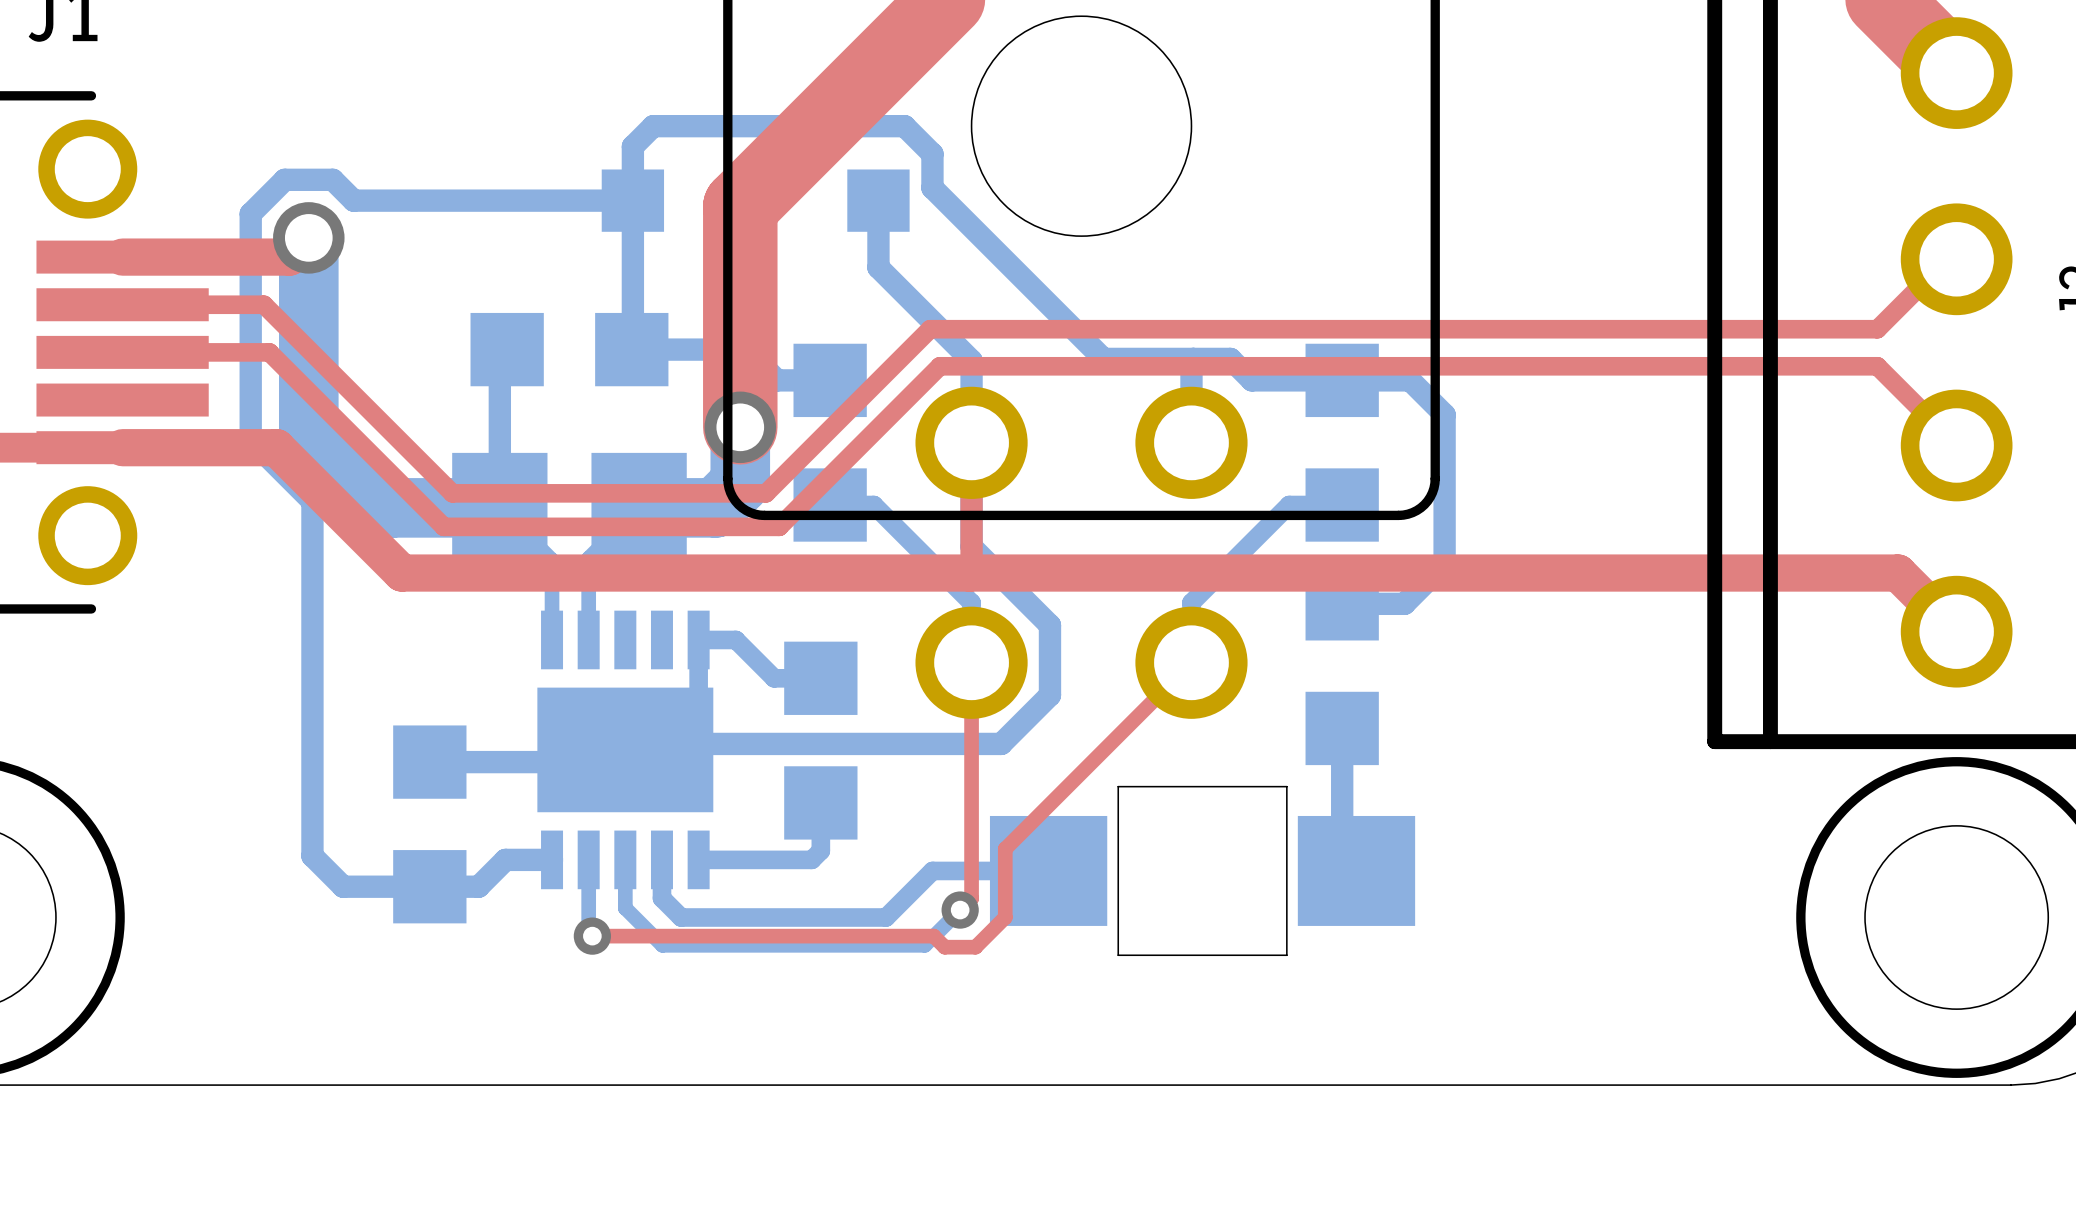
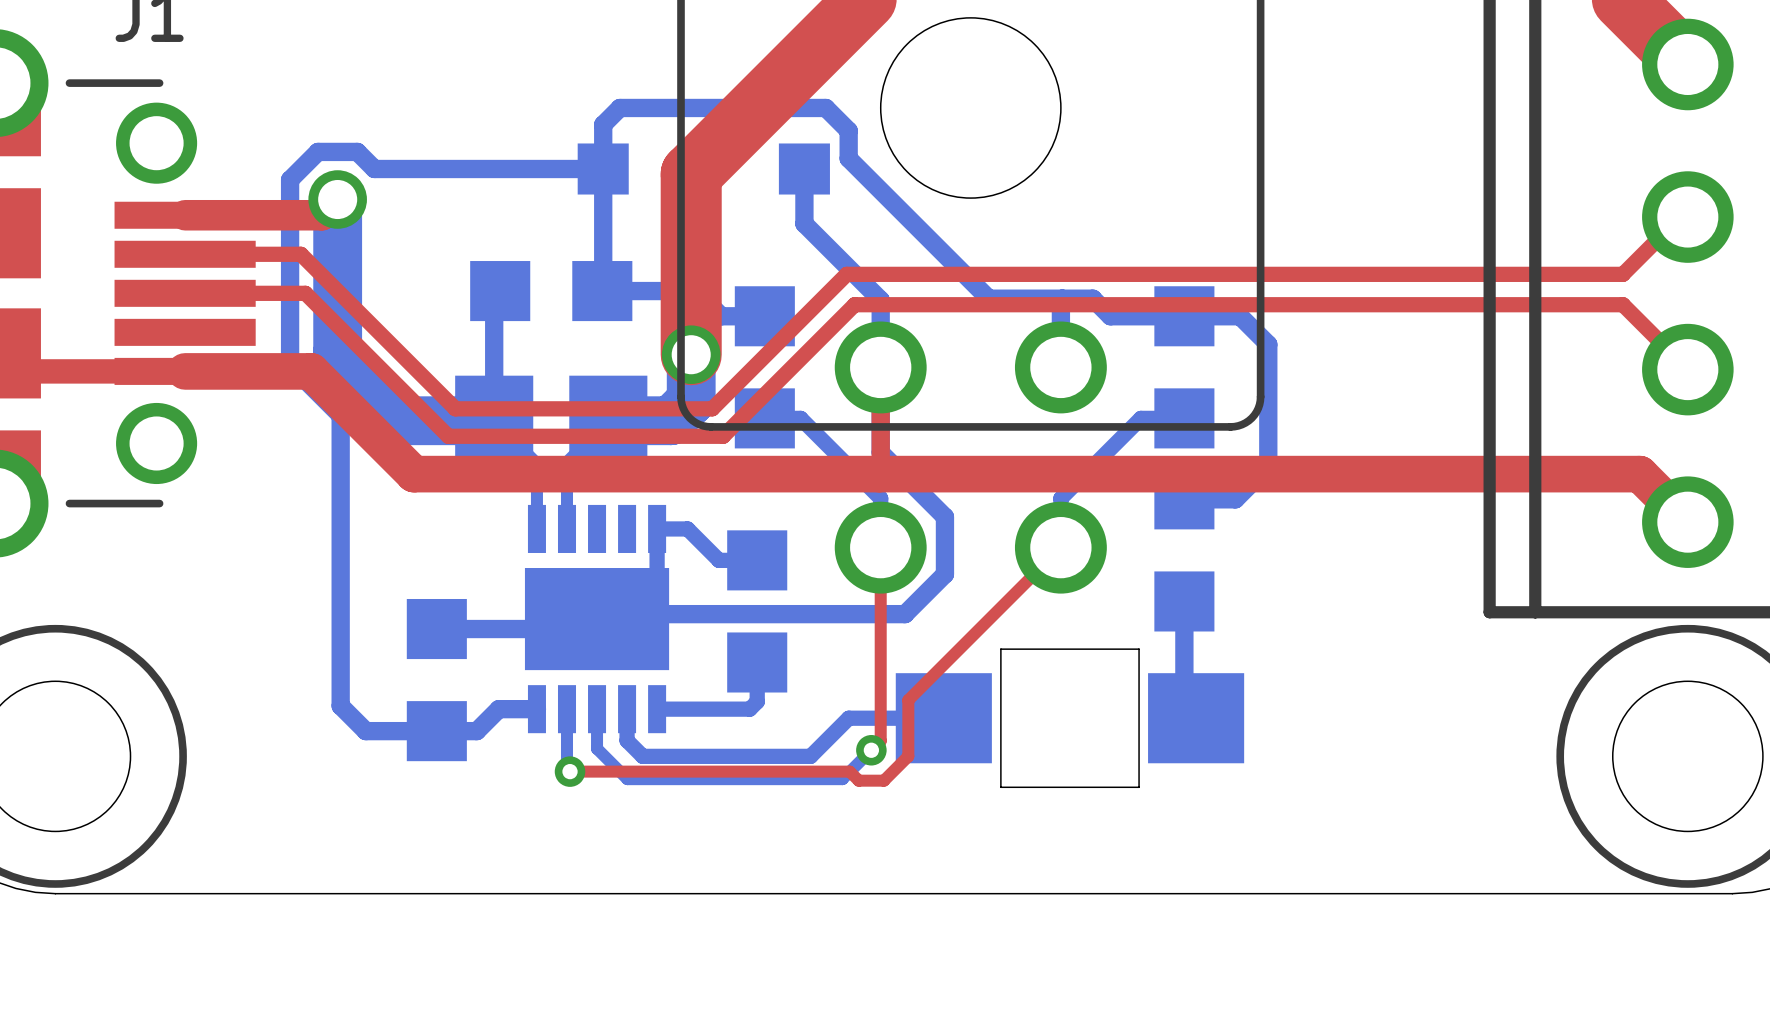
top track width: thin (122, 447) (276, 447) (401, 573) (1897, 573) (1956, 631) -> thick (185, 371) (311, 371) (413, 474) (1639, 474) (1687, 522)

